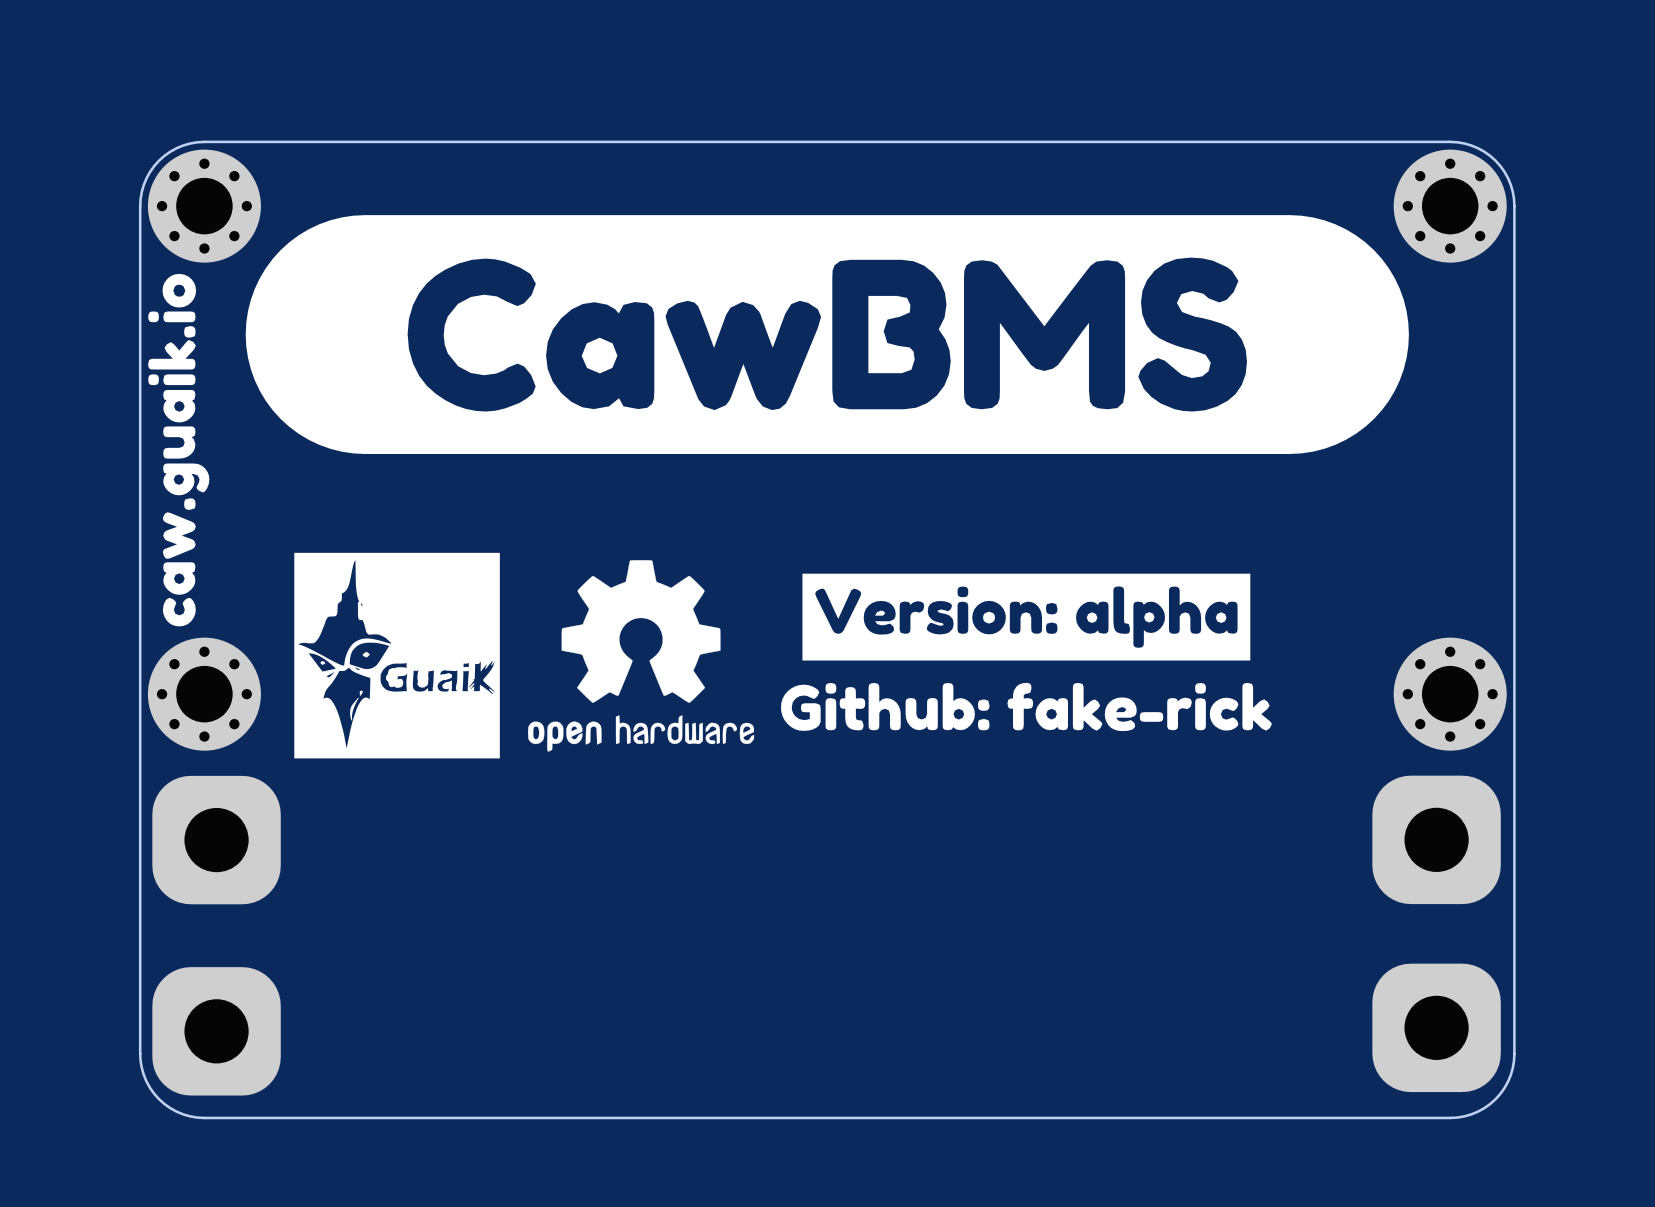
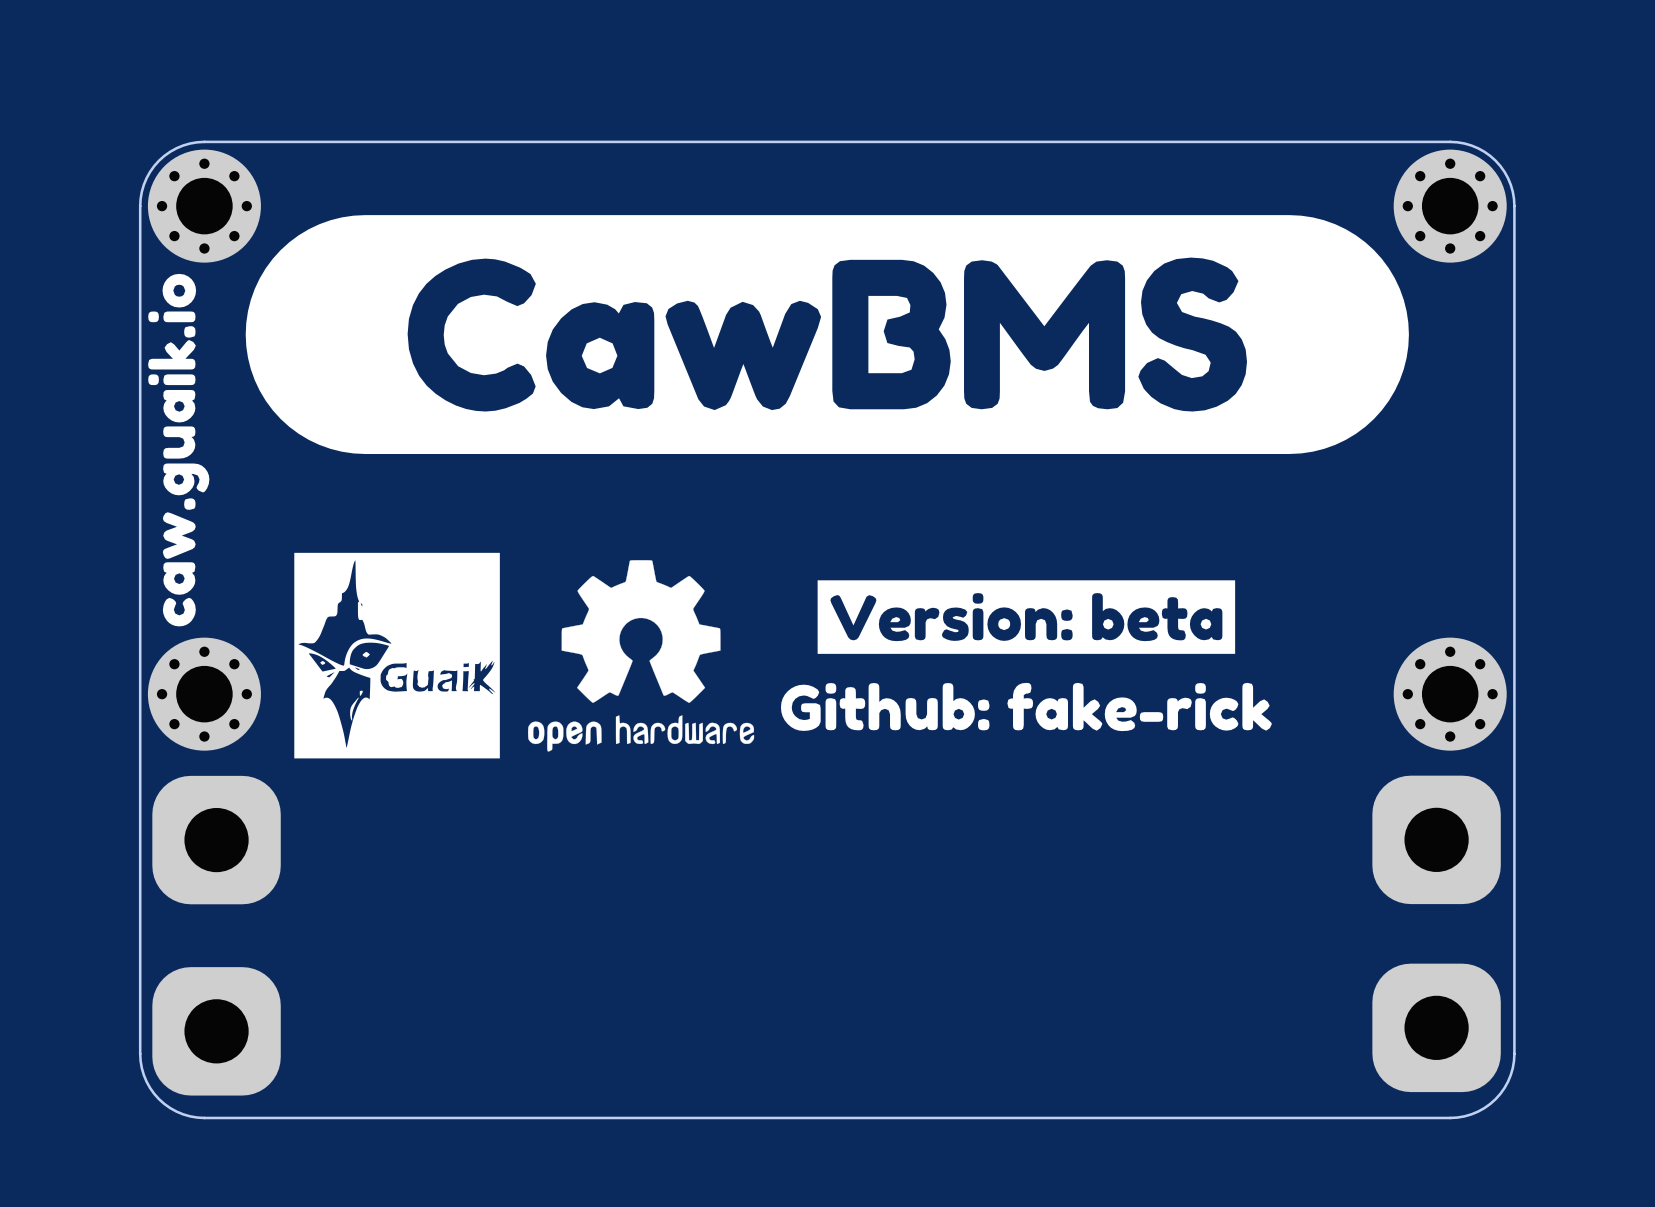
drawing shape: [802, 573, 1251, 661] -> [817, 580, 1236, 654]

